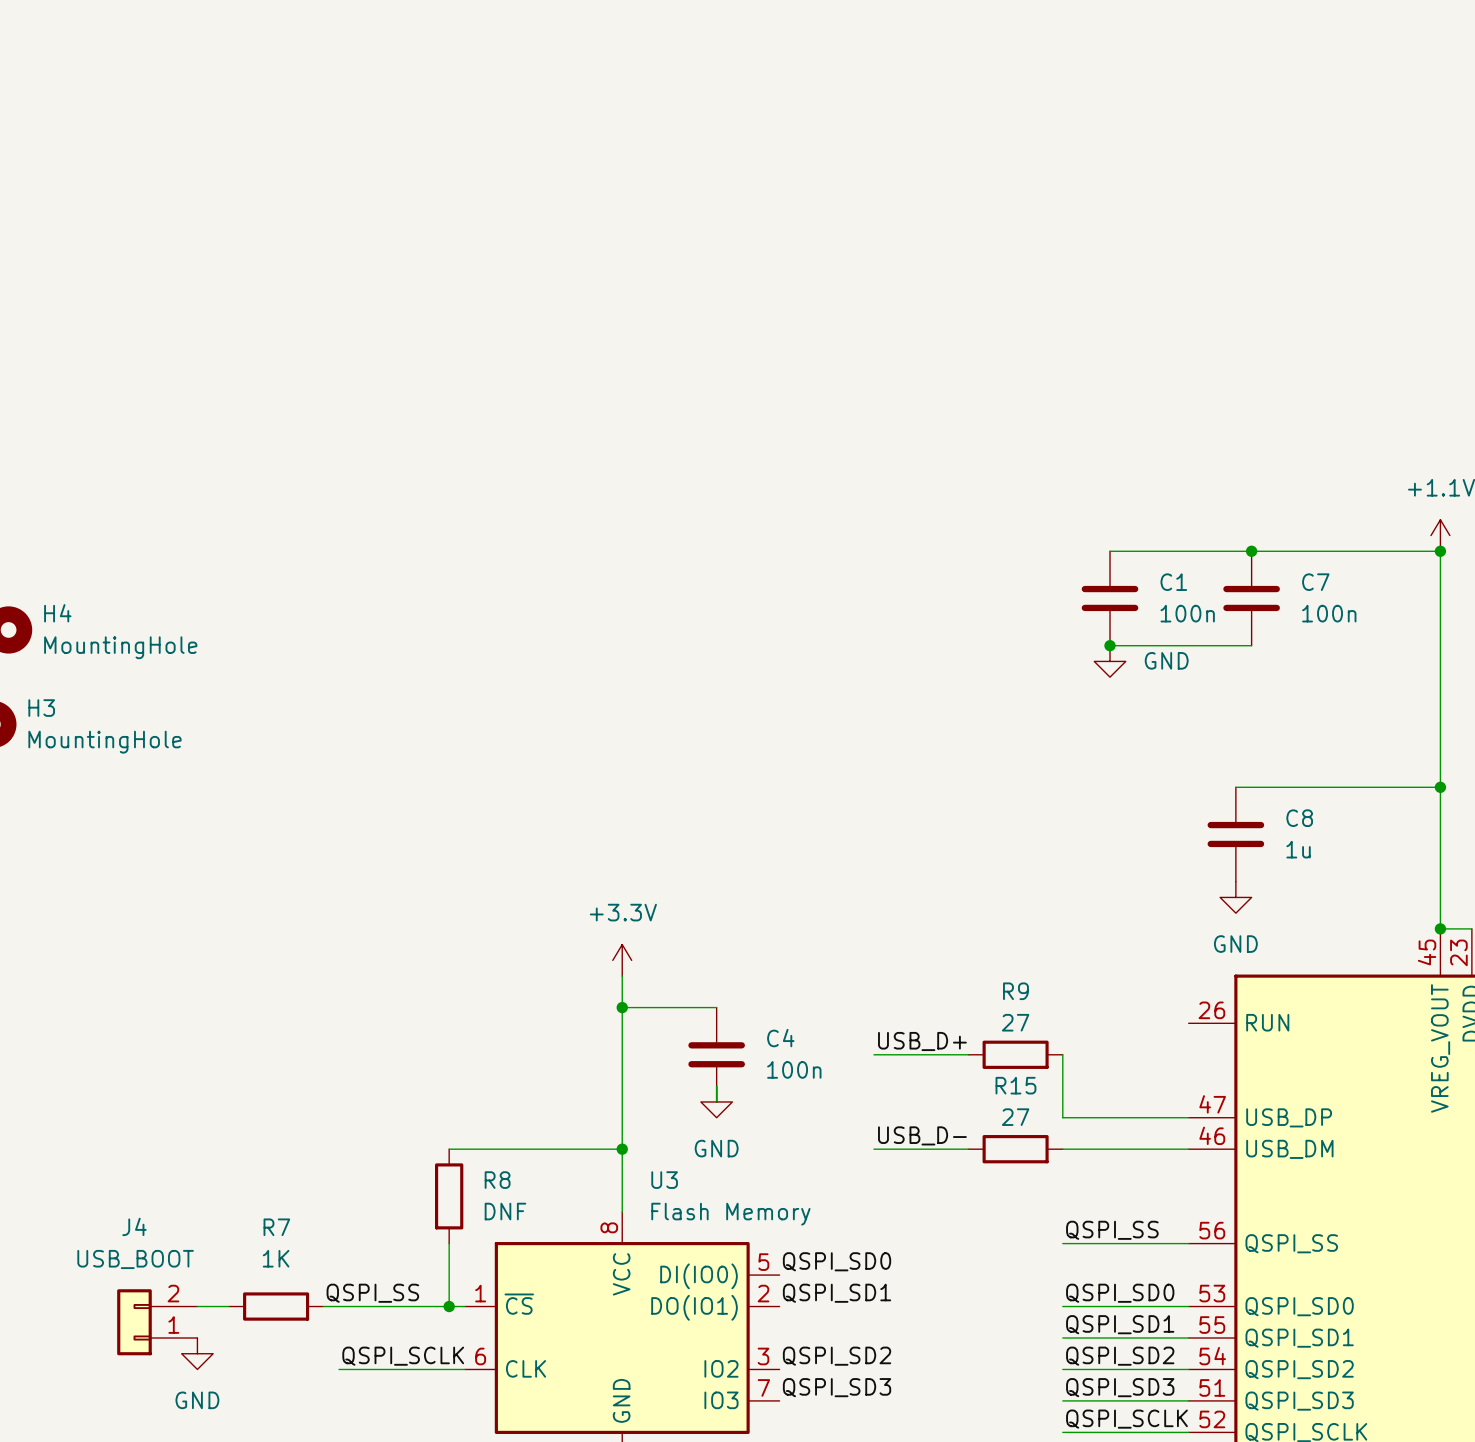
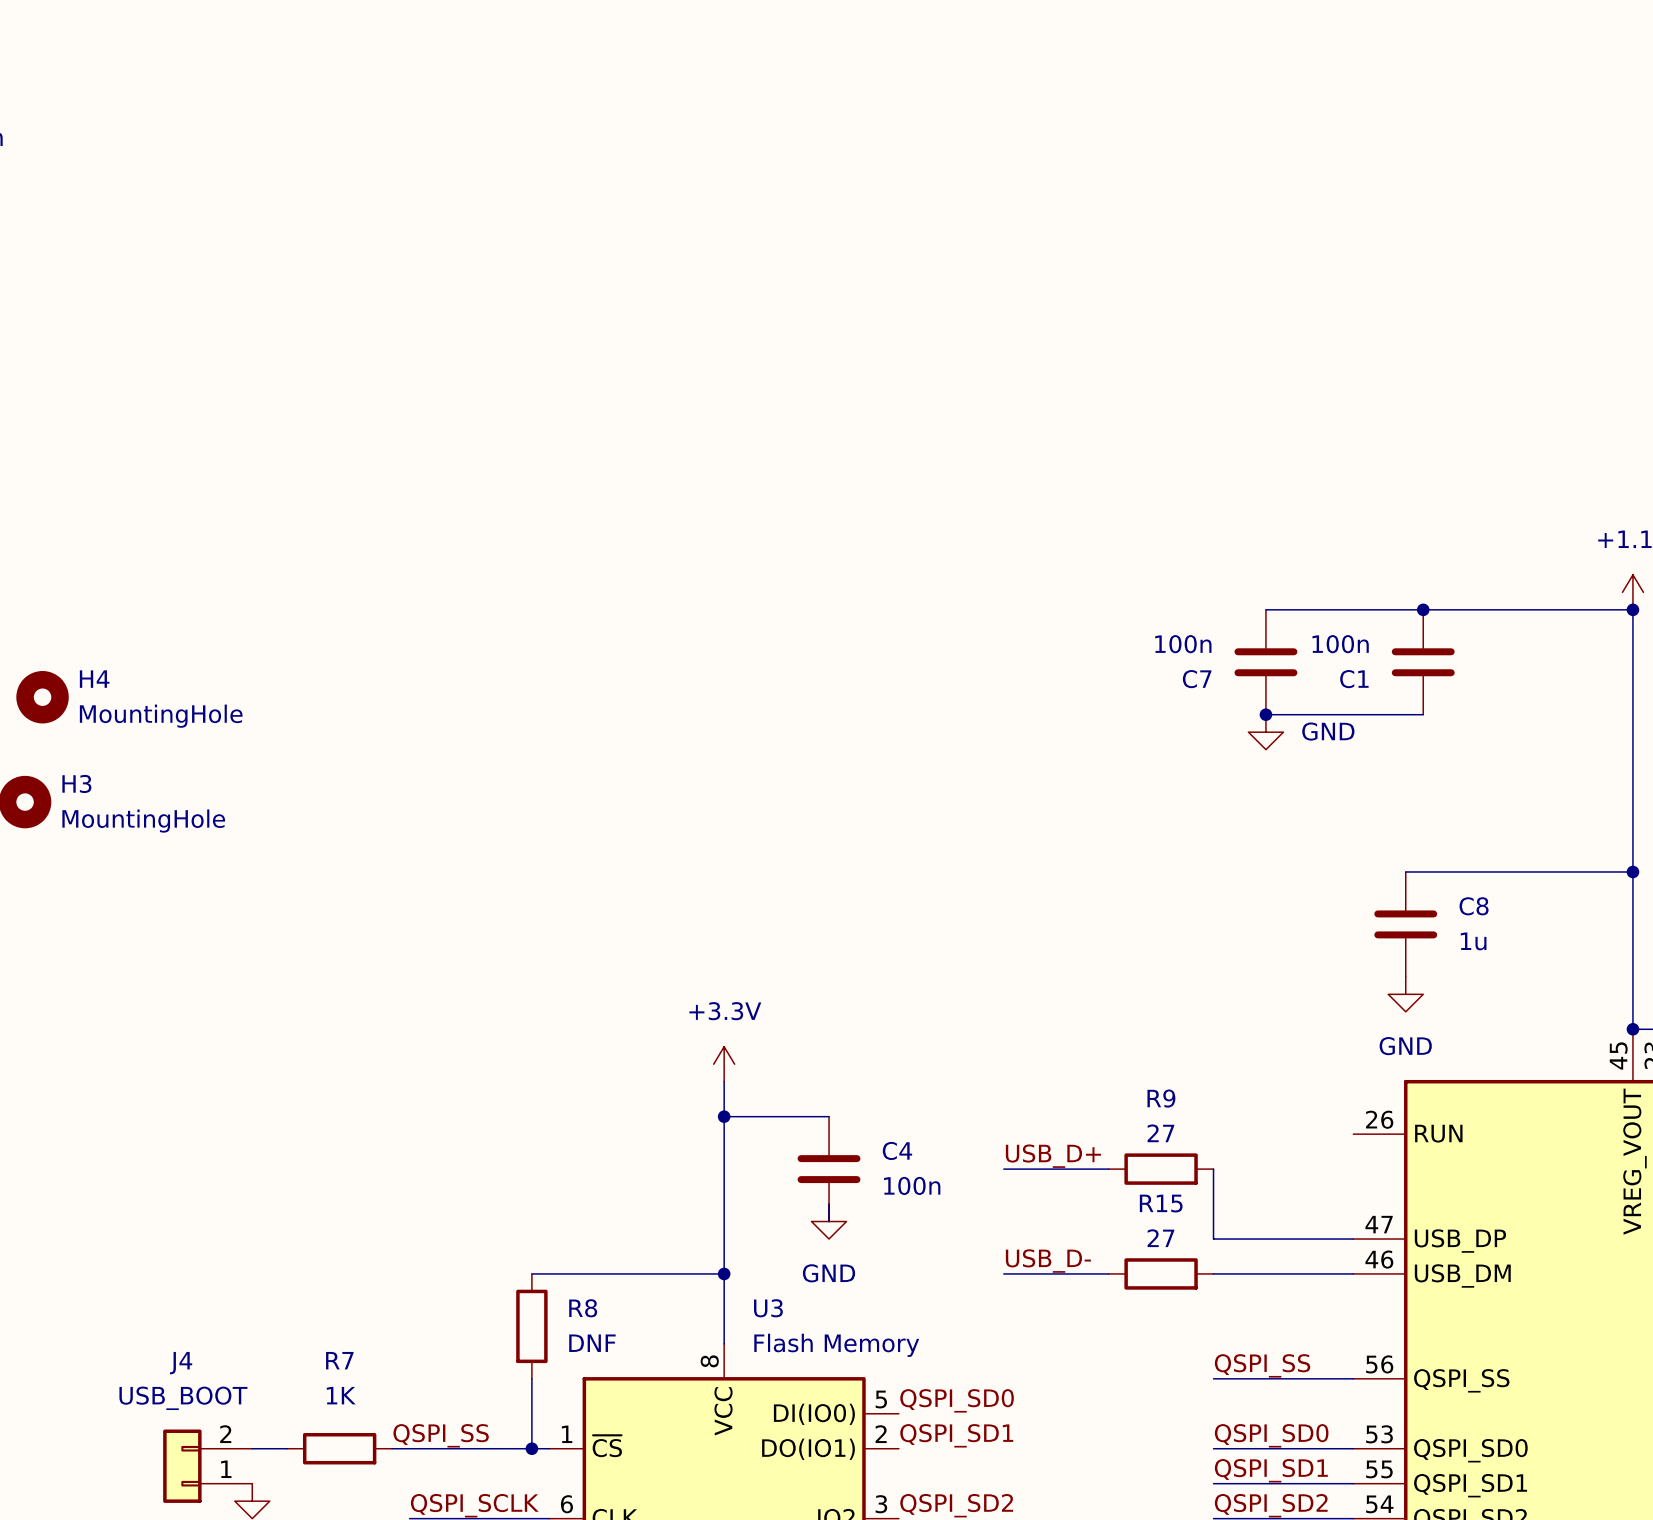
C1 name: C1 (1173, 582) -> C7 (1197, 679)
C7 name: C7 (1315, 582) -> C1 (1354, 679)
C1 value position: 100n (1187, 613) -> 100n (1183, 644)
C7 value position: 100n (1329, 613) -> 100n (1340, 644)

